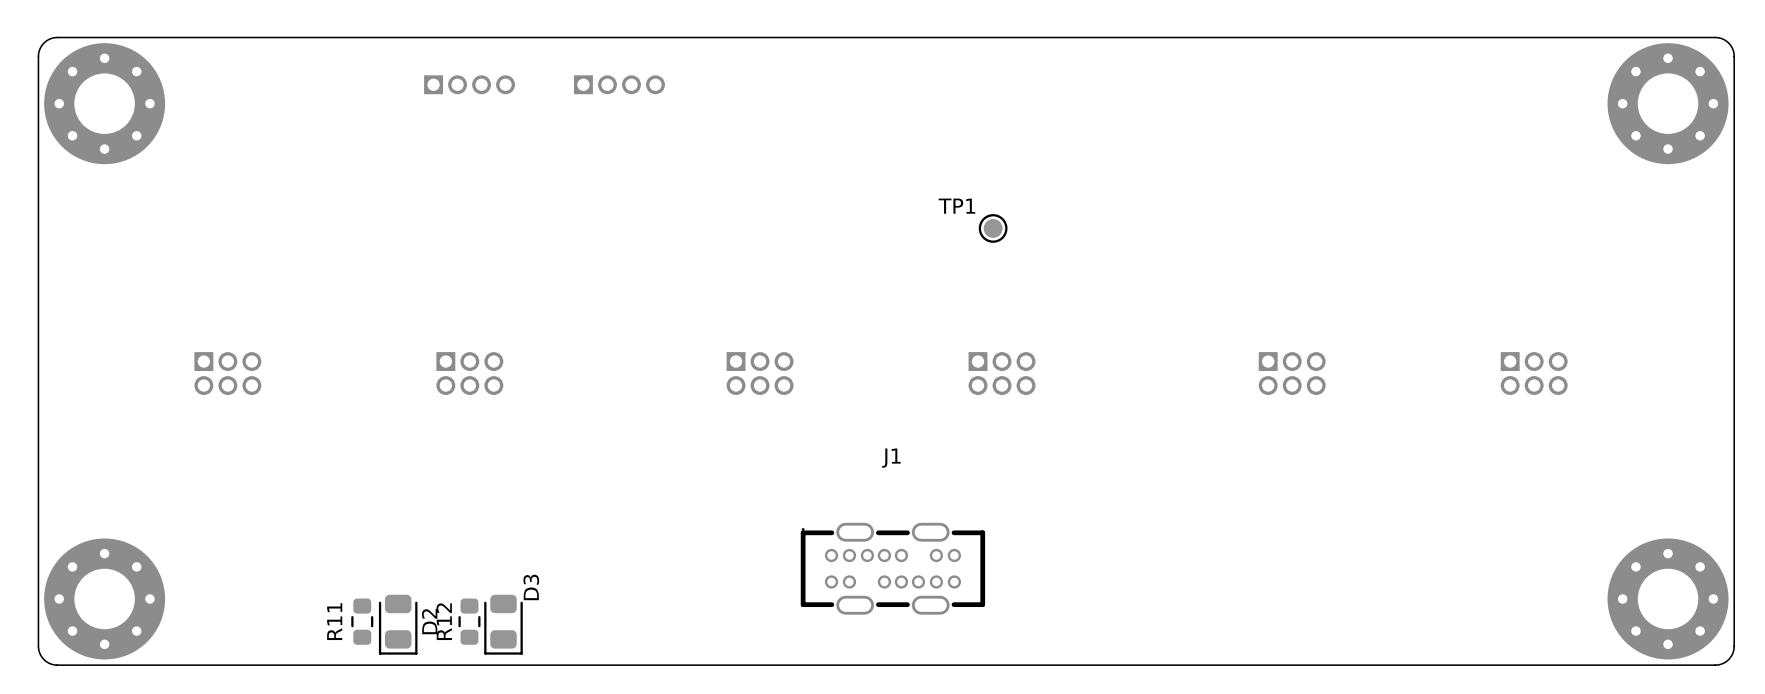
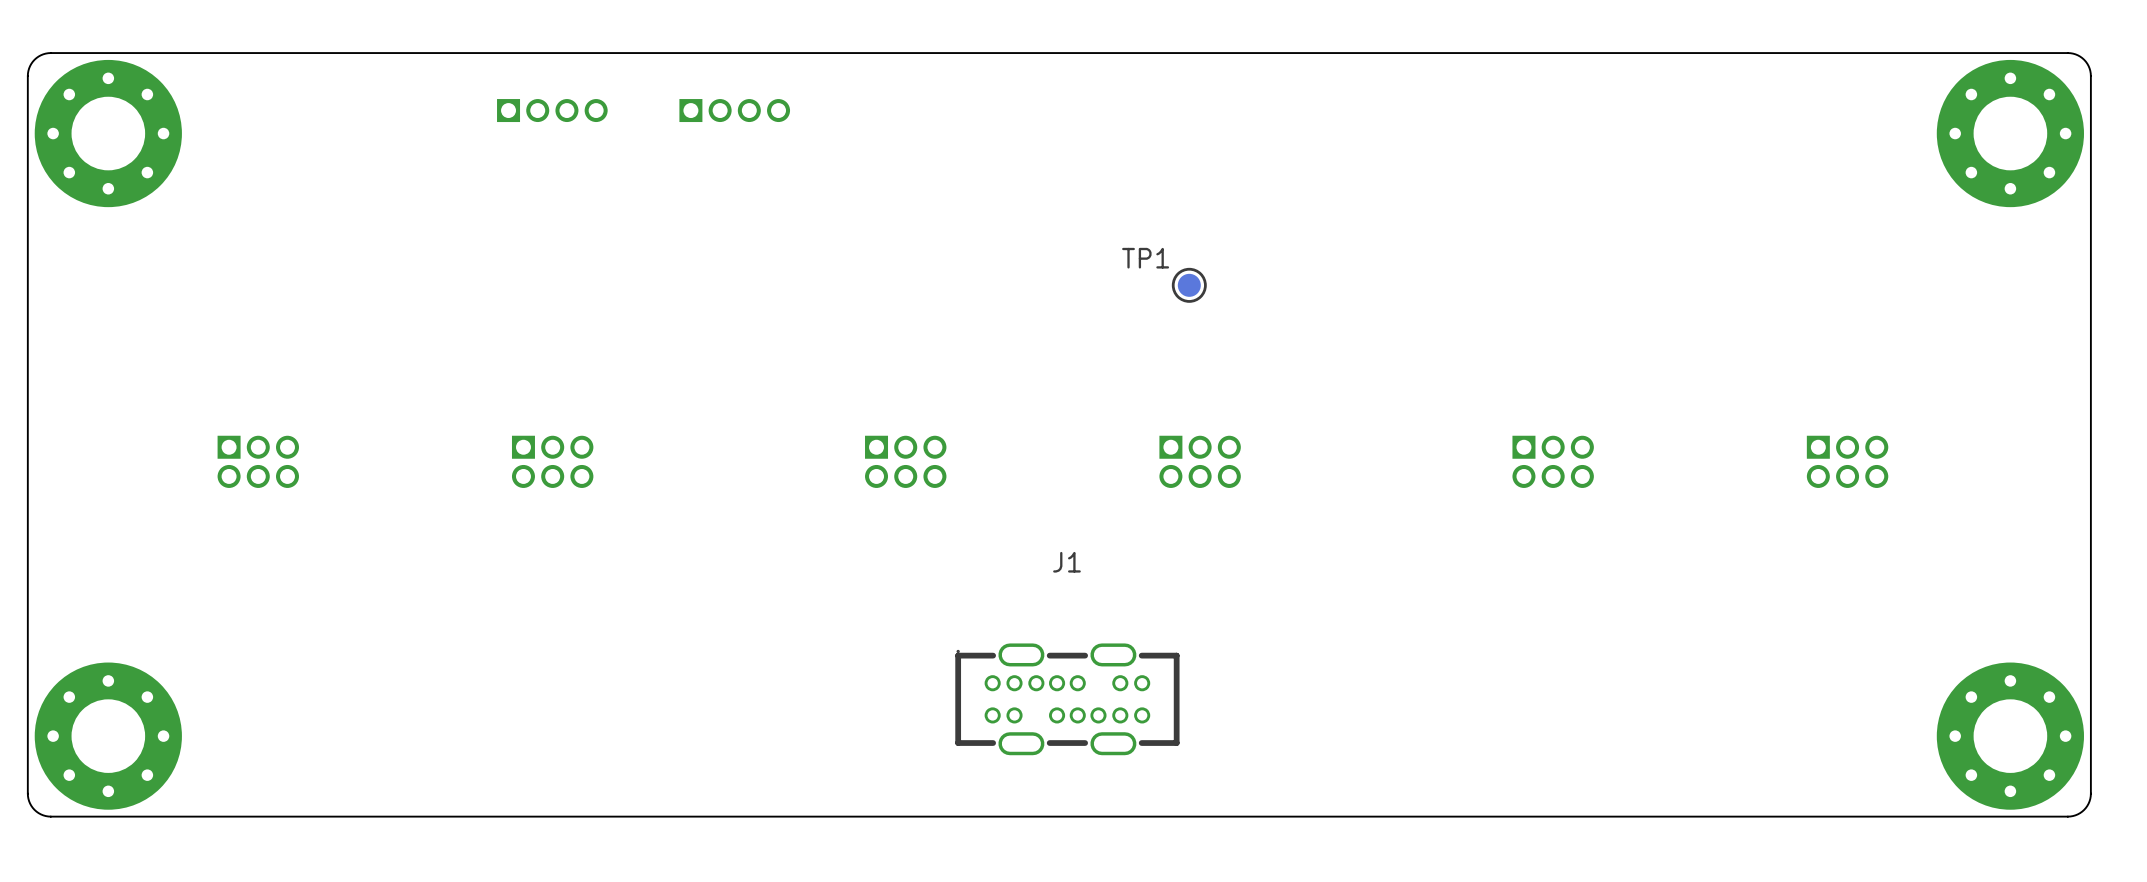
R11: (362, 621) -> none
R12: (469, 621) -> none
D2: (398, 624) -> none
D3: (503, 624) -> none

